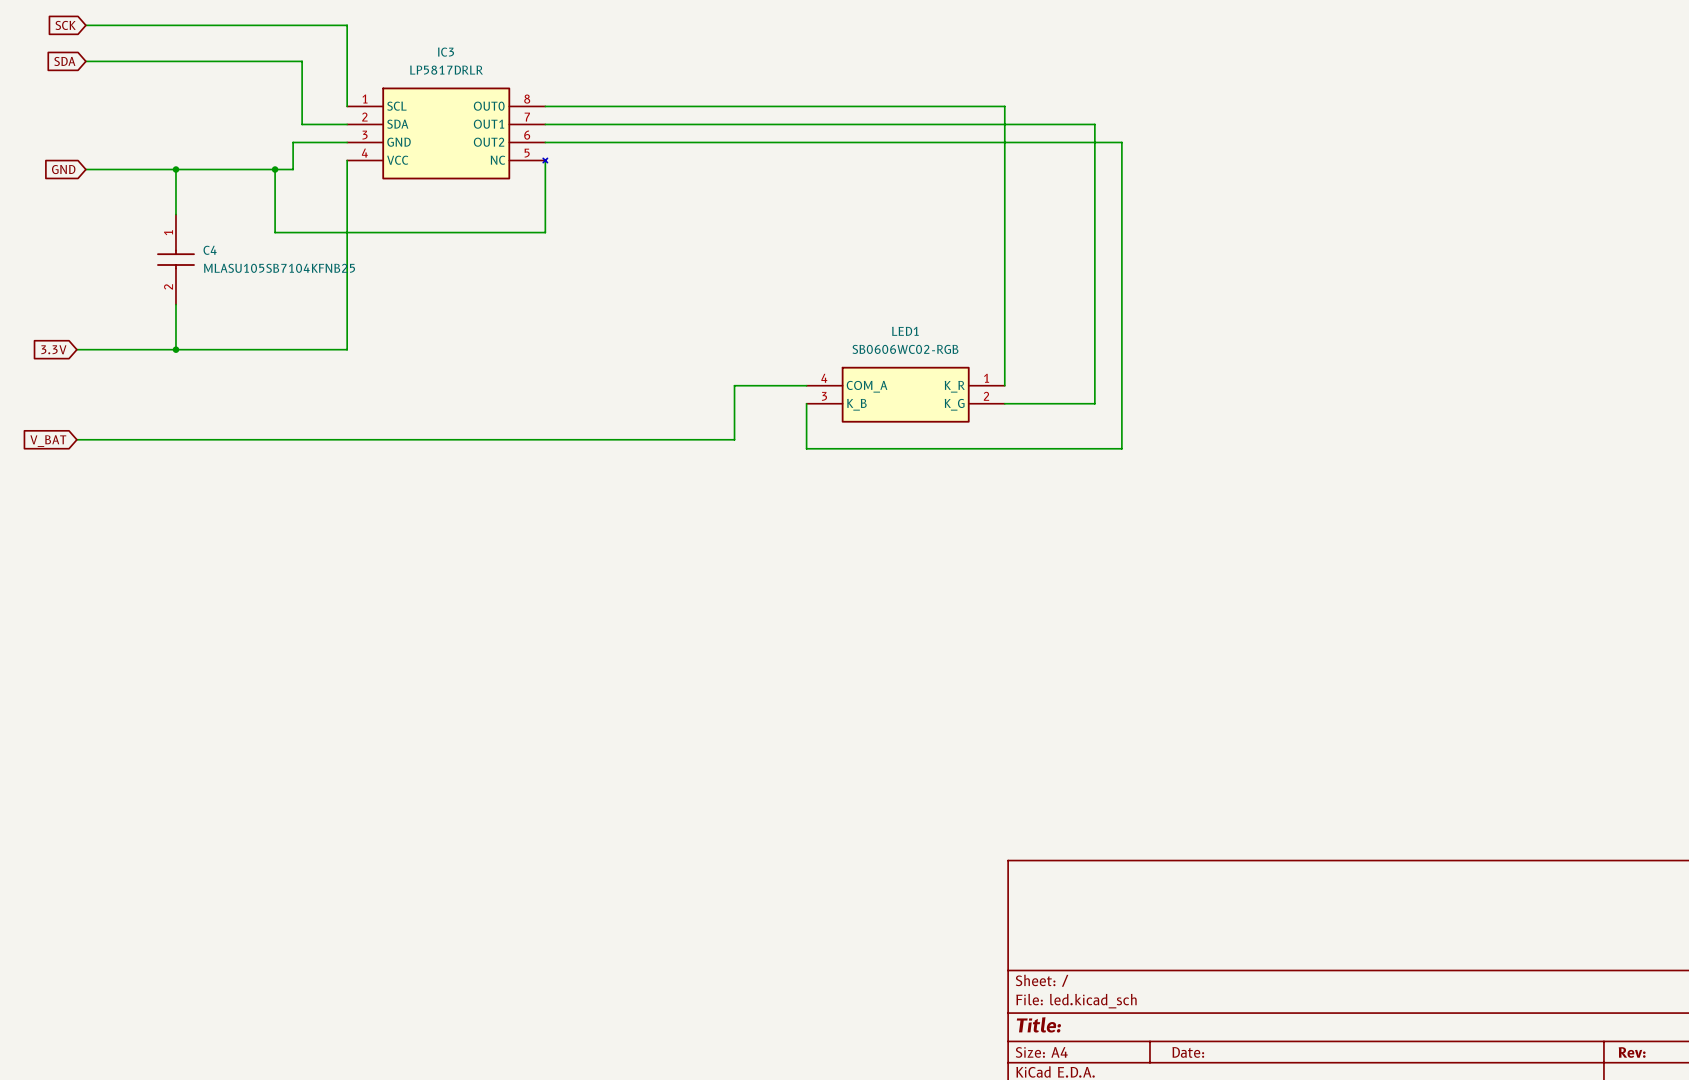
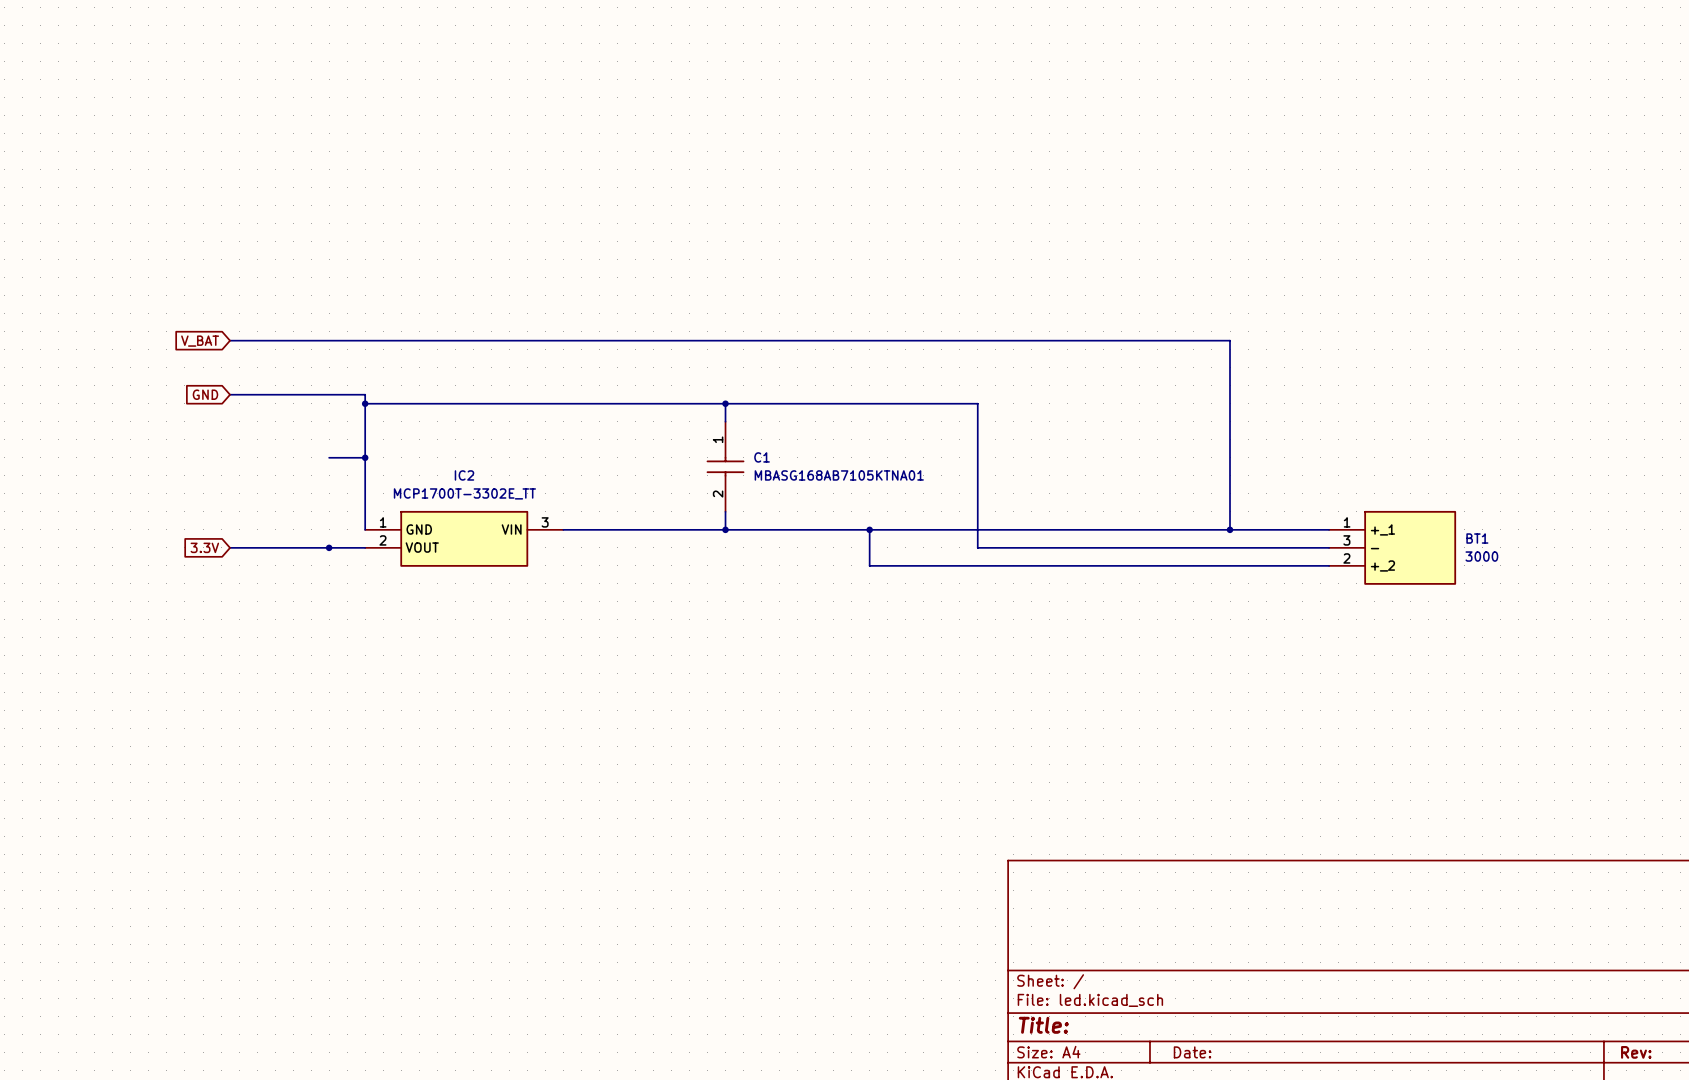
global label: SCK (65, 25) -> none
wire: (85, 25) (347, 25) (347, 106) -> none
global label: SDA (64, 61) -> none
wire: (85, 61) (302, 61) (302, 124) (347, 124) -> none
wire: (545, 106) (1004, 106) (1004, 385) -> none
wire: (545, 124) (1094, 124) (1094, 403) (1004, 403) -> none
IC3: LP5817DRLR (447, 133) -> none
wire: (347, 142) (293, 142) (293, 169) (85, 169) -> none
wire: (545, 142) (1121, 142) (1121, 448) (806, 448) (806, 403) -> none
wire: (347, 160) (347, 349) (76, 349) -> none
wire: (545, 160) (545, 232) (275, 232) (275, 169) -> none
global label: GND (63, 169) -> none
wire: (175, 169) (175, 214) -> none
junction: (175, 169) -> none
junction: (275, 169) -> none
C4: MLASU105SB7104KFNB25 (175, 259) -> none
wire: (175, 304) (175, 349) -> none
wire: none -> (230, 340) (1230, 340) (1230, 529)
global label: none -> V_BAT (200, 341)
global label: 3.3V (53, 349) -> none
junction: (175, 349) -> none
wire: (806, 385) (734, 385) (734, 439) (76, 439) -> none
global label: none -> GND (205, 394)
wire: none -> (230, 394) (365, 394) (365, 529)
LED1: SB0606WC02-RGB (905, 394) -> none
wire: none -> (365, 403) (977, 403) (977, 547) (1329, 547)
junction: none -> (365, 403)
wire: none -> (725, 403) (725, 421)
junction: none -> (725, 403)
global label: V_BAT (48, 441) -> none
wire: none -> (329, 457) (365, 457)
junction: none -> (365, 457)
C1: none -> MBASG168AB7105KTNA01 (725, 466)
wire: none -> (725, 511) (725, 529)
wire: none -> (563, 529) (1329, 529)
junction: none -> (725, 529)
wire: none -> (869, 529) (869, 565) (1329, 565)
junction: none -> (869, 529)
junction: none -> (1230, 529)
IC2: none -> MCP1700T-3302E_TT (464, 538)
global label: none -> 3.3V (204, 547)
wire: none -> (230, 547) (365, 547)
junction: none -> (329, 547)
BT1: none -> 3000 (1392, 547)

